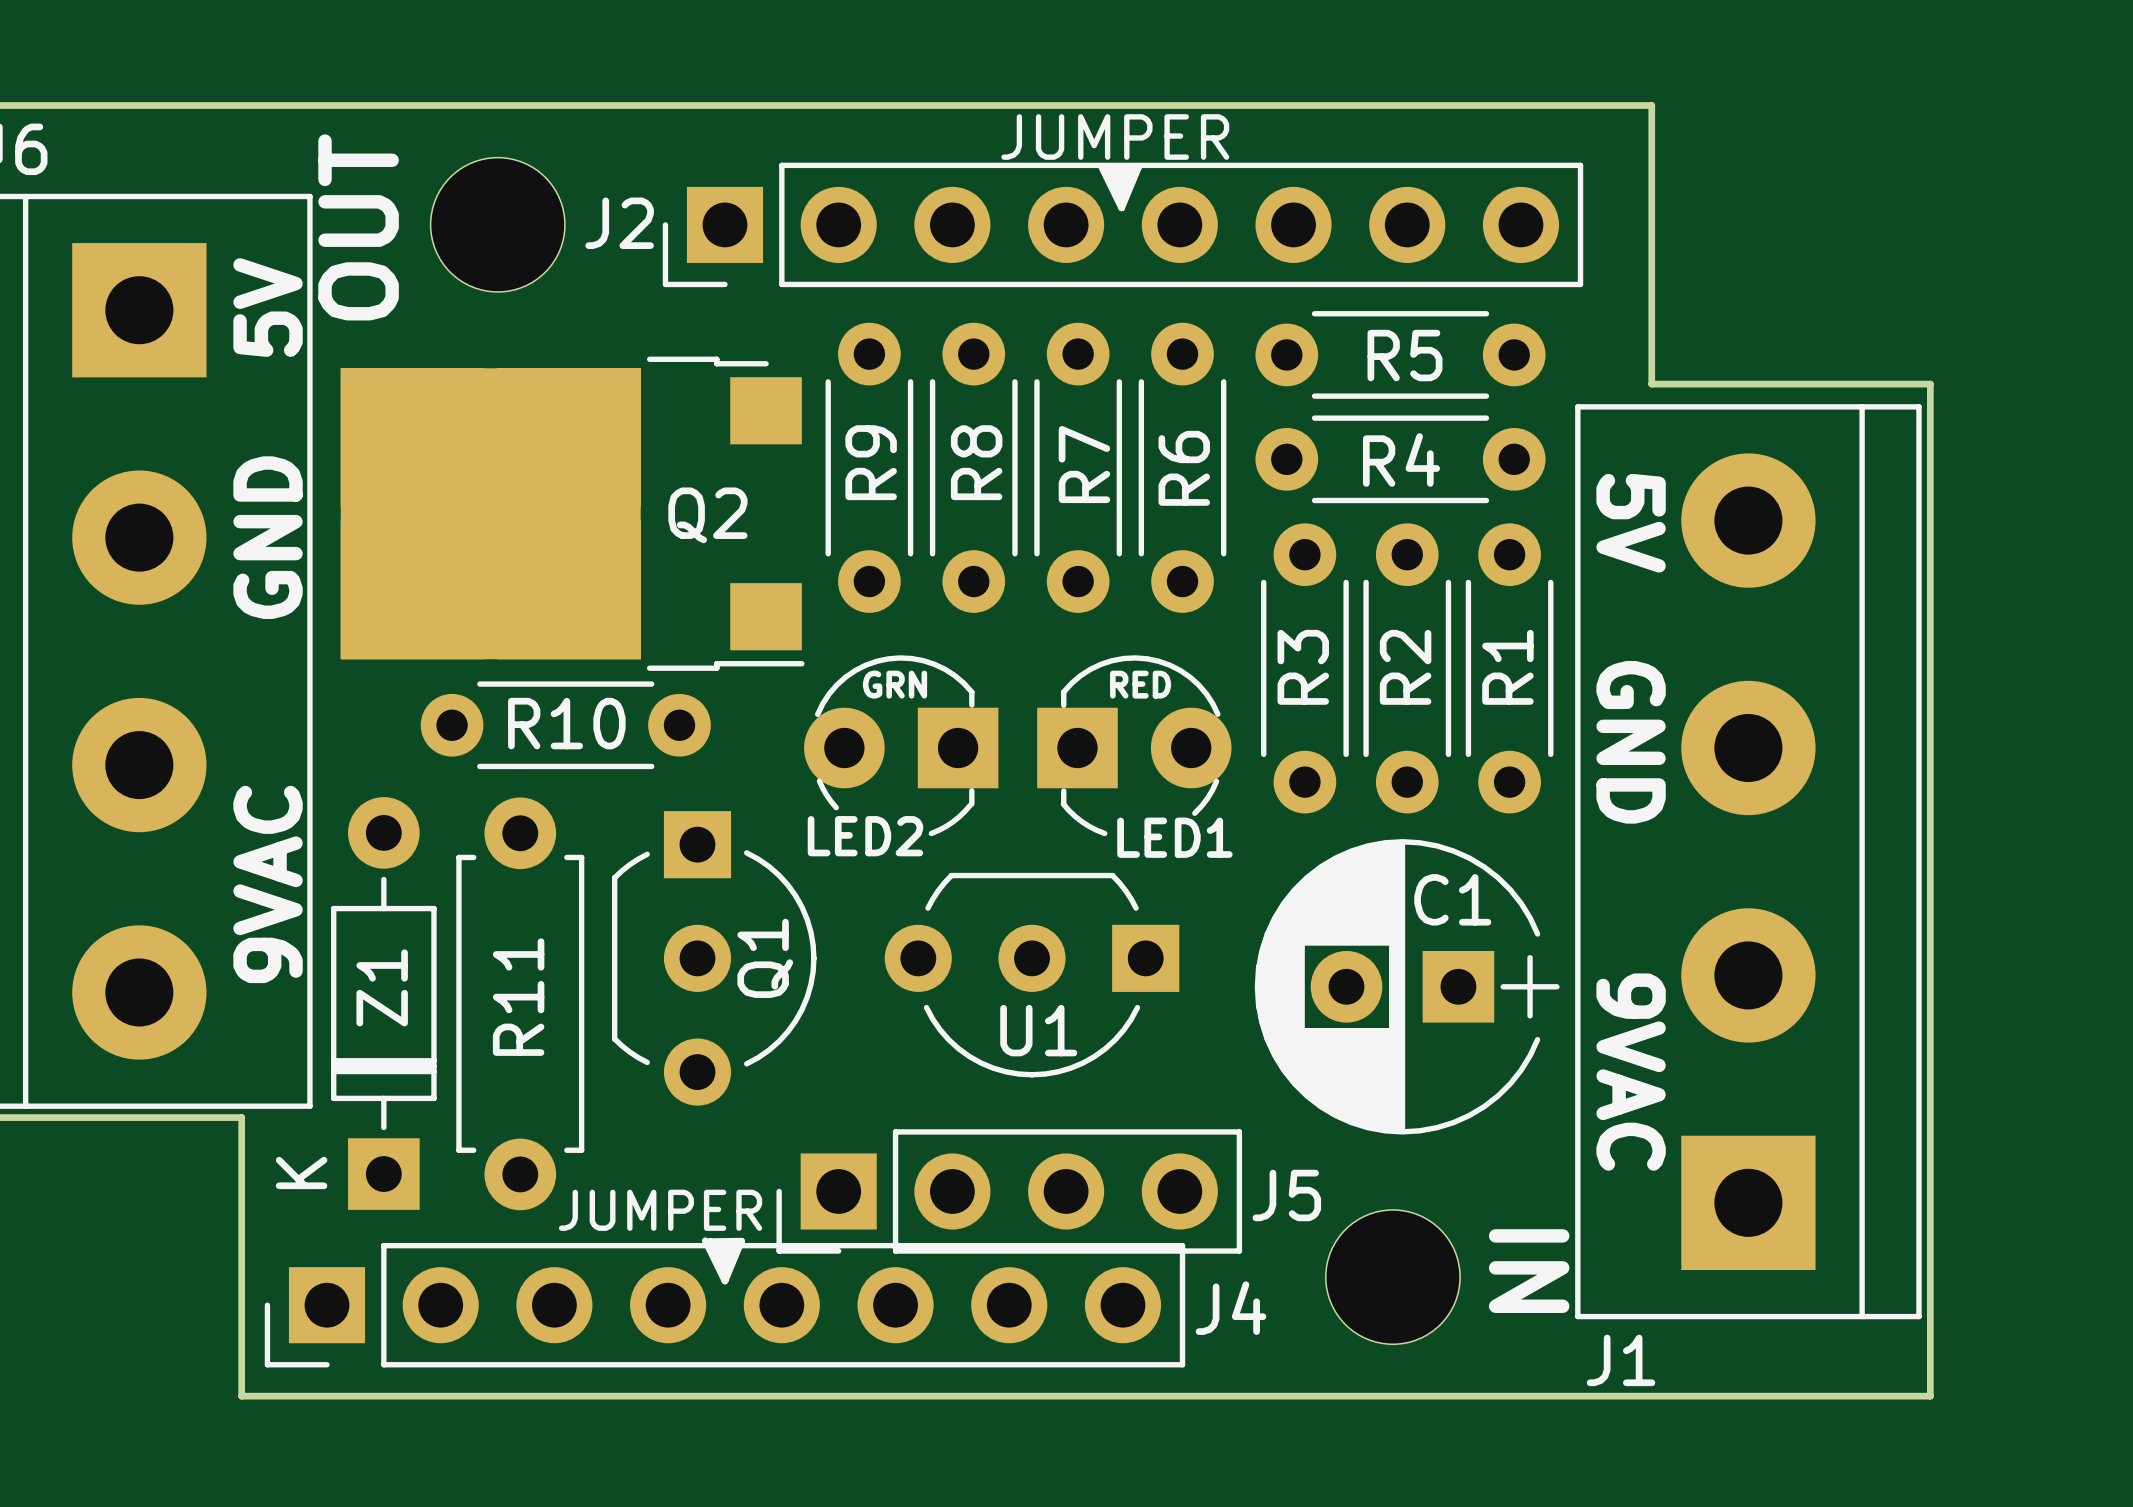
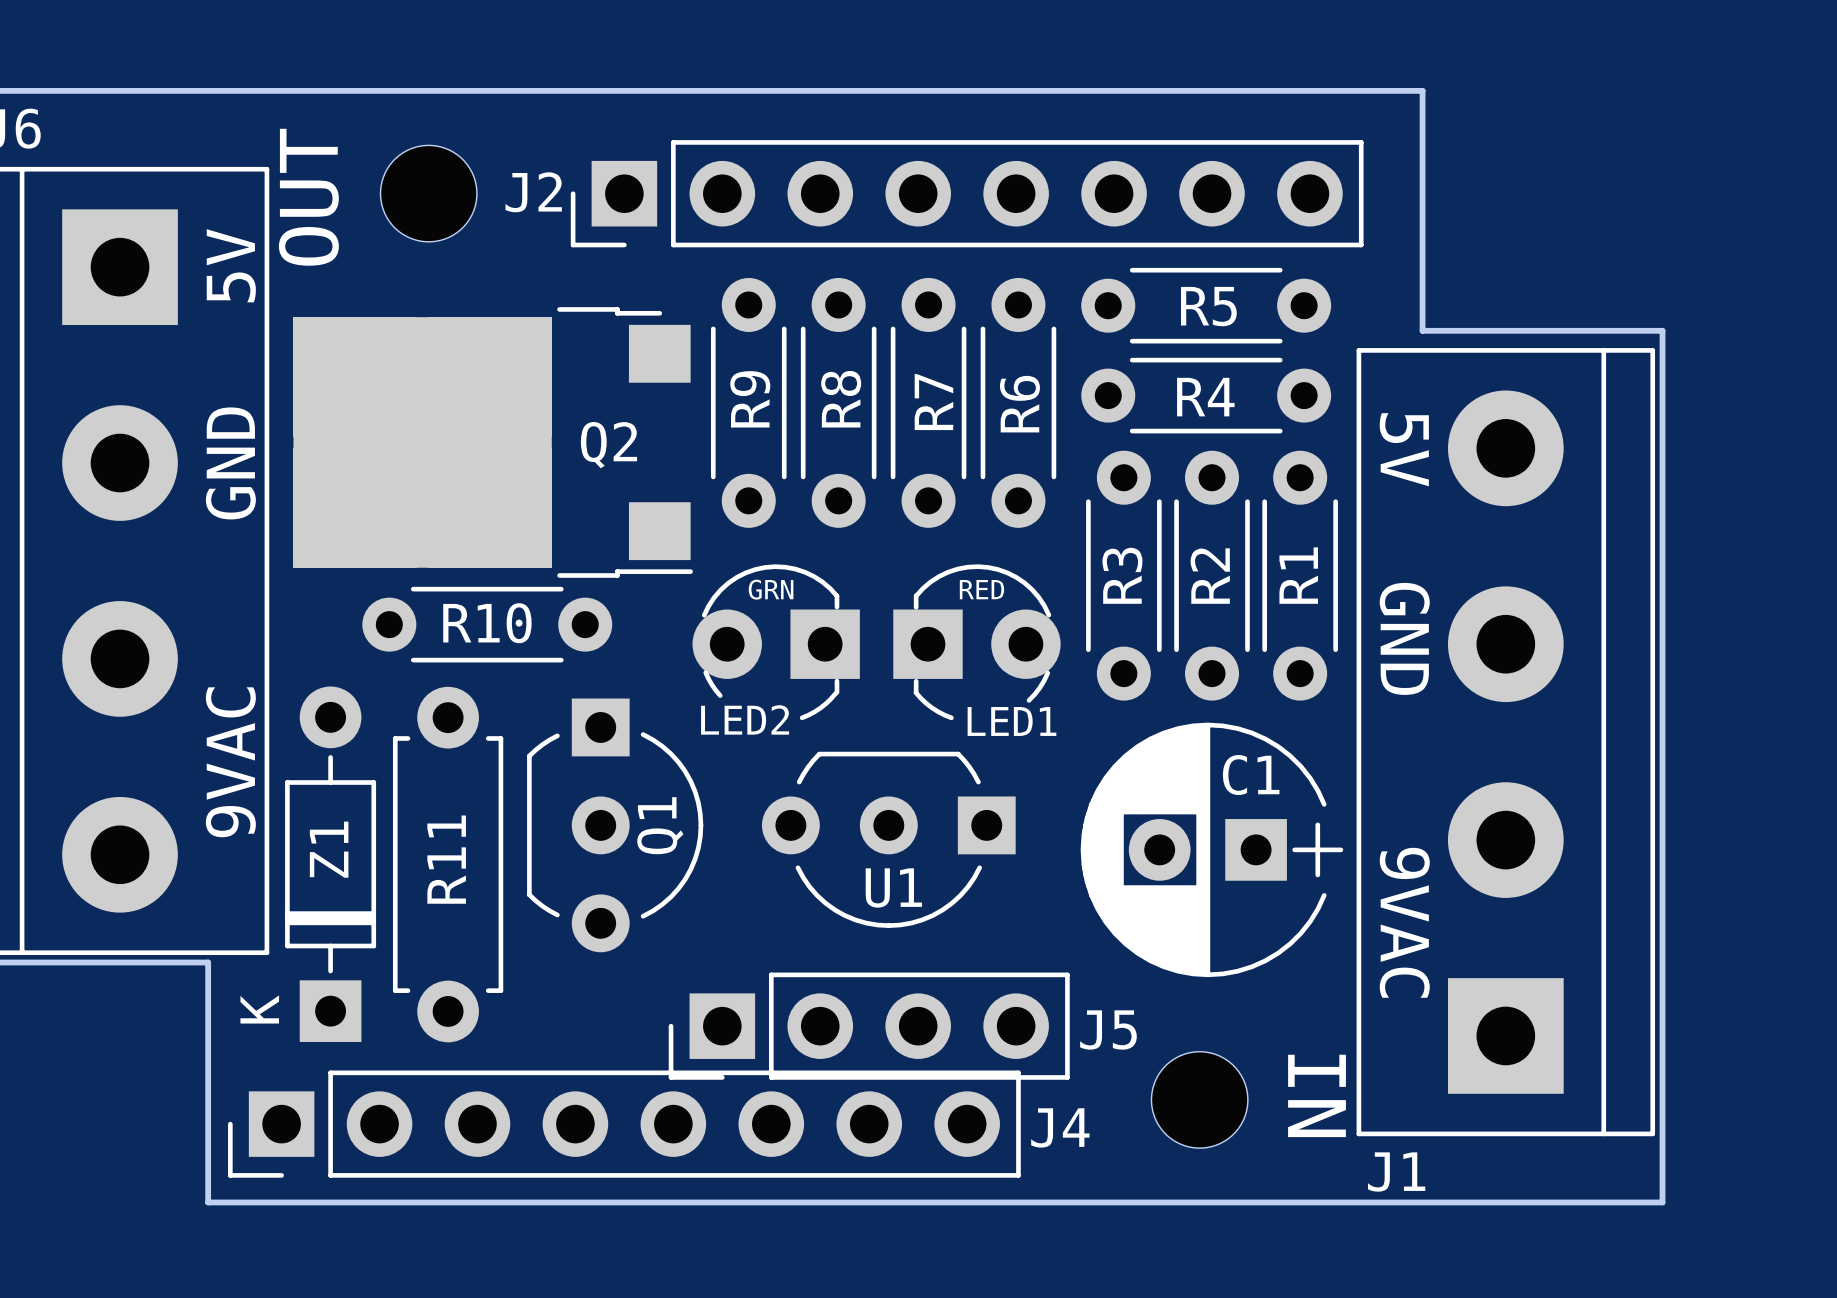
text: JUMPER (1115, 137) -> none
part footprint: [430, 157, 565, 292] -> [380, 145, 477, 242]
line: (1101, 167) (1121, 207) (1138, 168) (1106, 168) (1120, 196) (1131, 173) (1113, 172) (1120, 186) (1124, 177) (1117, 179) -> none
part footprint: [1325, 1209, 1461, 1345] -> [1151, 1051, 1248, 1149]
text: JUMPER (660, 1210) -> none
line: (705, 1240) (724, 1281) (741, 1241) (709, 1241) (724, 1269) (734, 1246) (716, 1246) (724, 1259) (728, 1251) (720, 1253) -> none

